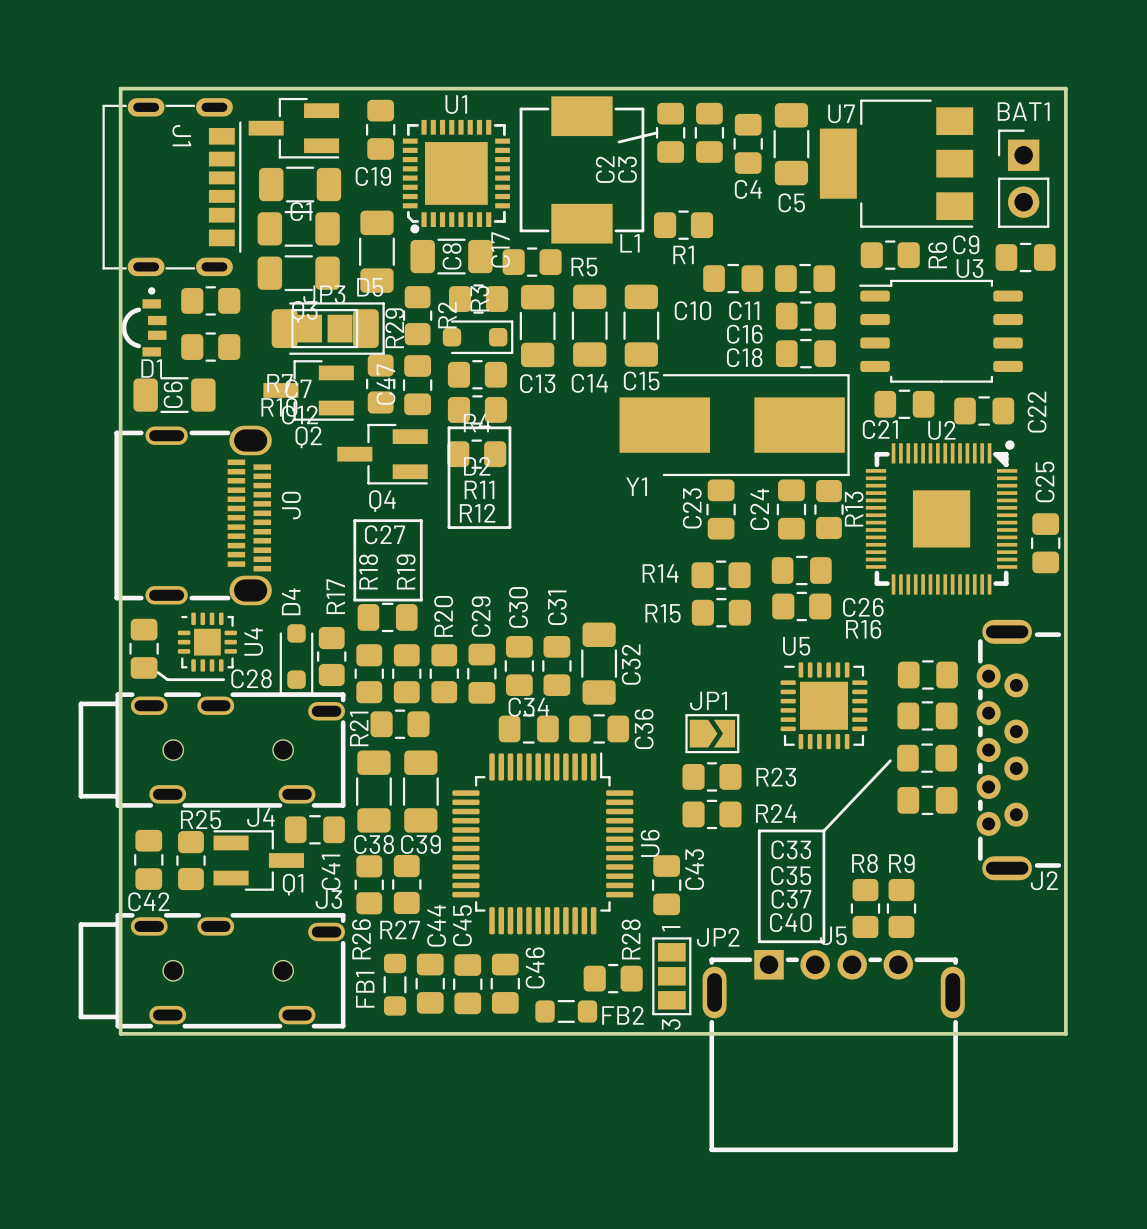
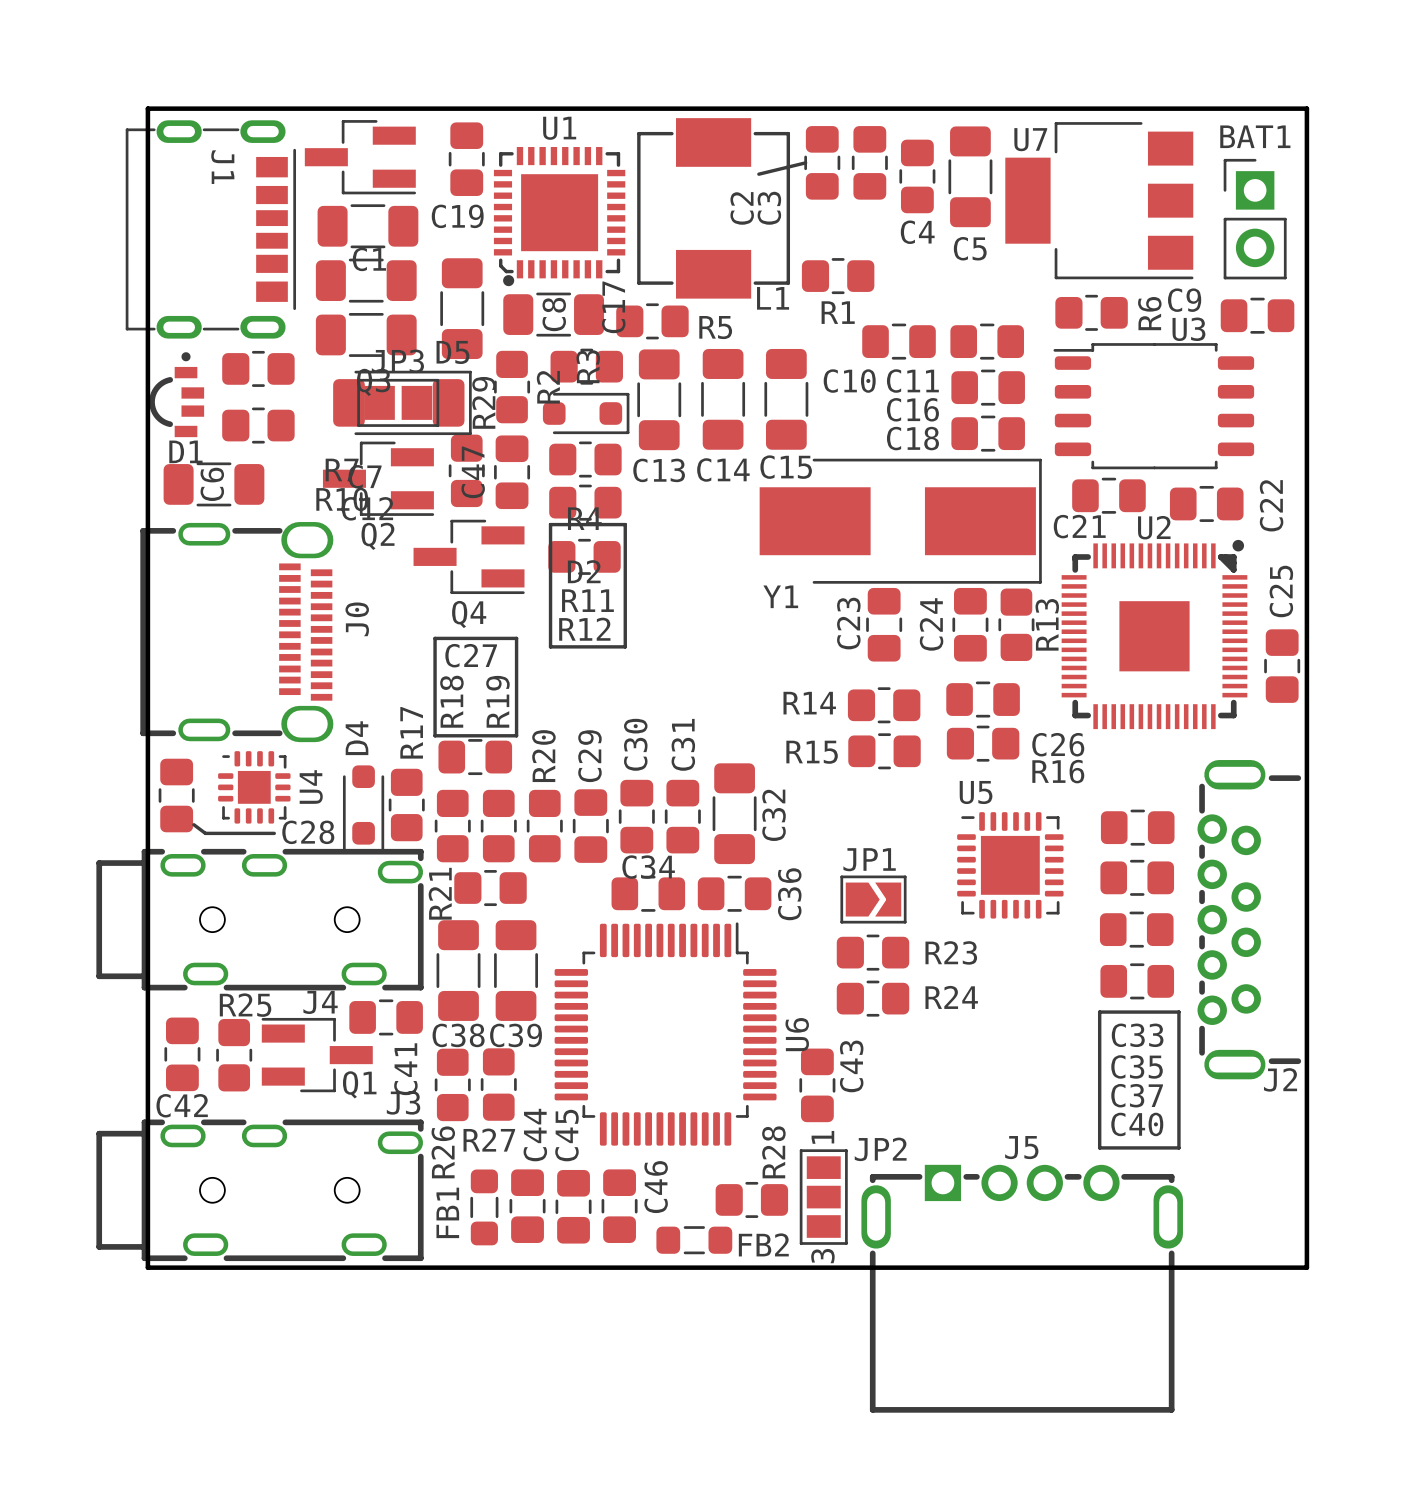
line: (890, 760) (823, 830) -> none
line: none -> (1099, 1012) (1178, 1012) (1178, 1147) (1099, 1147) (1099, 1012)
line: (823, 830) (759, 830) (759, 941) (823, 941) (823, 830) -> none
C33 name position: C33 (791, 849) -> C33 (1137, 1035)
C35 name position: C35 (791, 875) -> C35 (1137, 1066)
C37 name position: C37 (791, 899) -> C37 (1137, 1095)
R8: (865, 908) -> none
R9: (901, 908) -> none
C40 name position: C40 (790, 922) -> C40 (1137, 1124)

